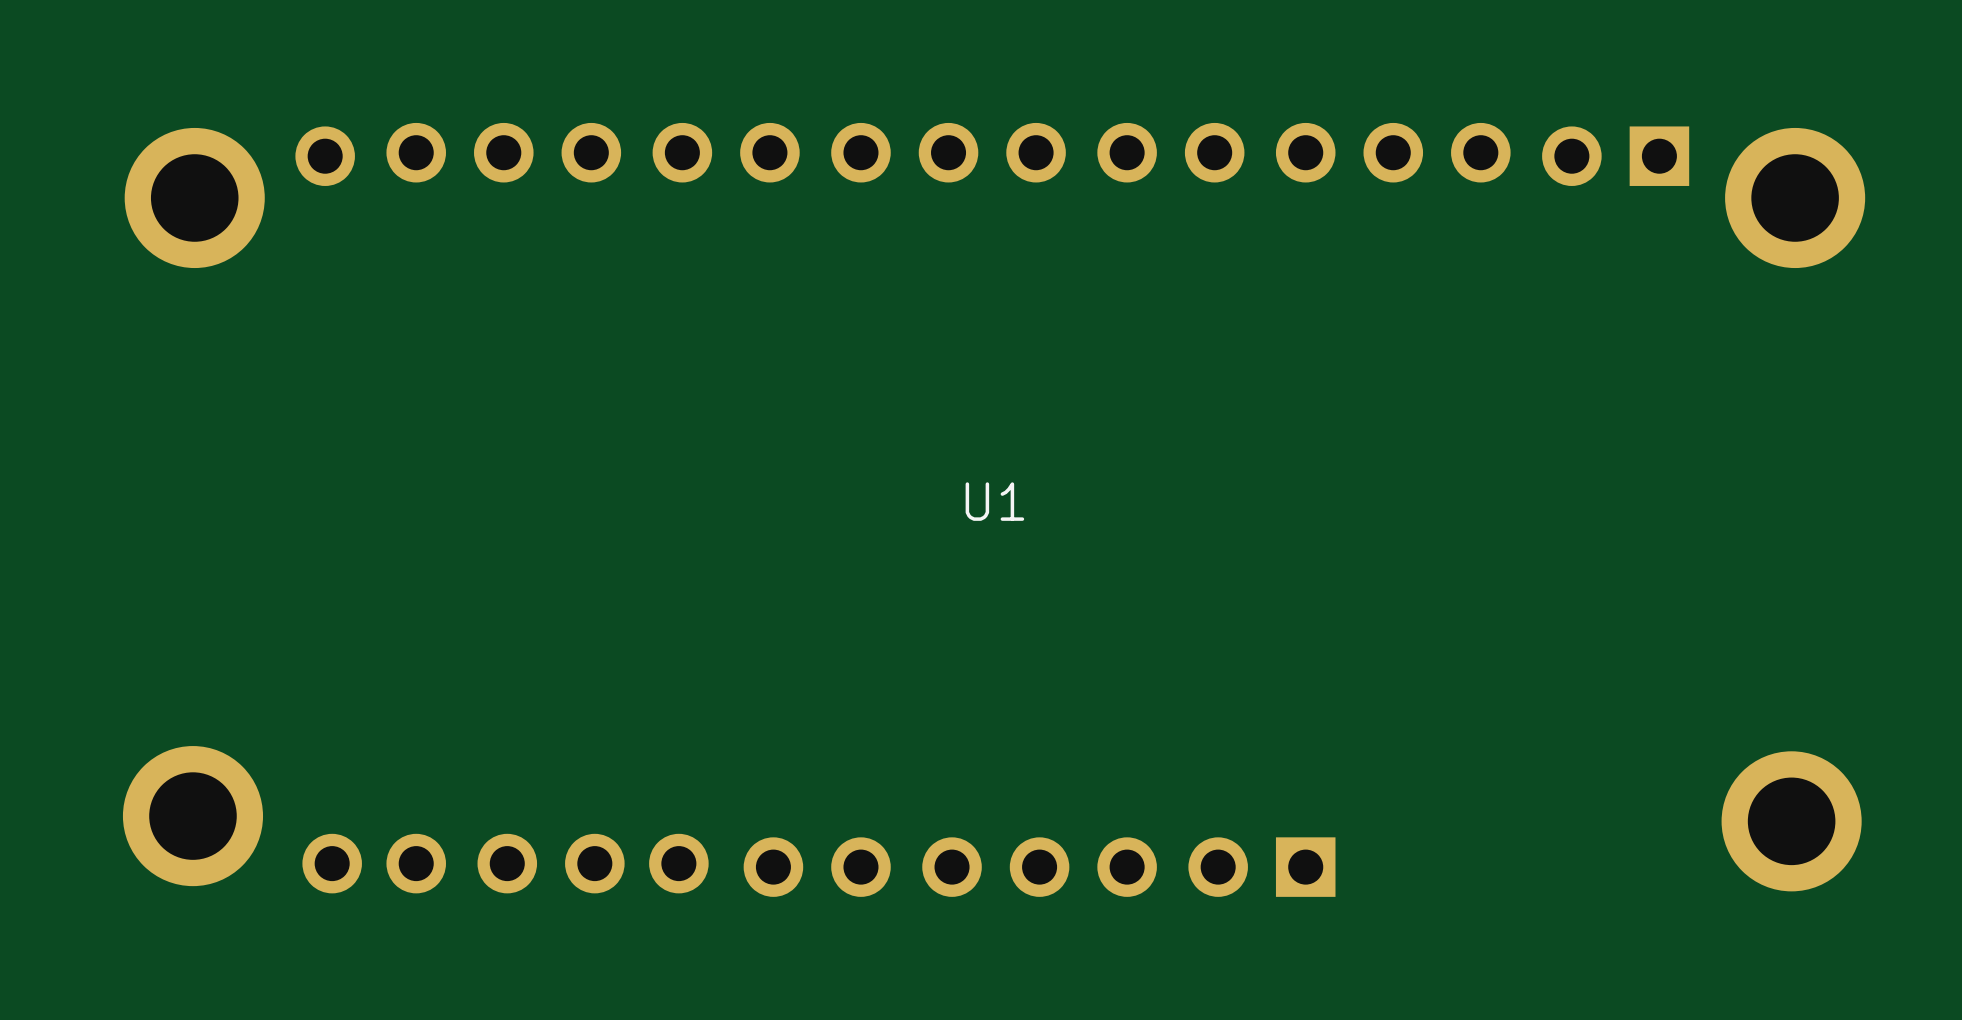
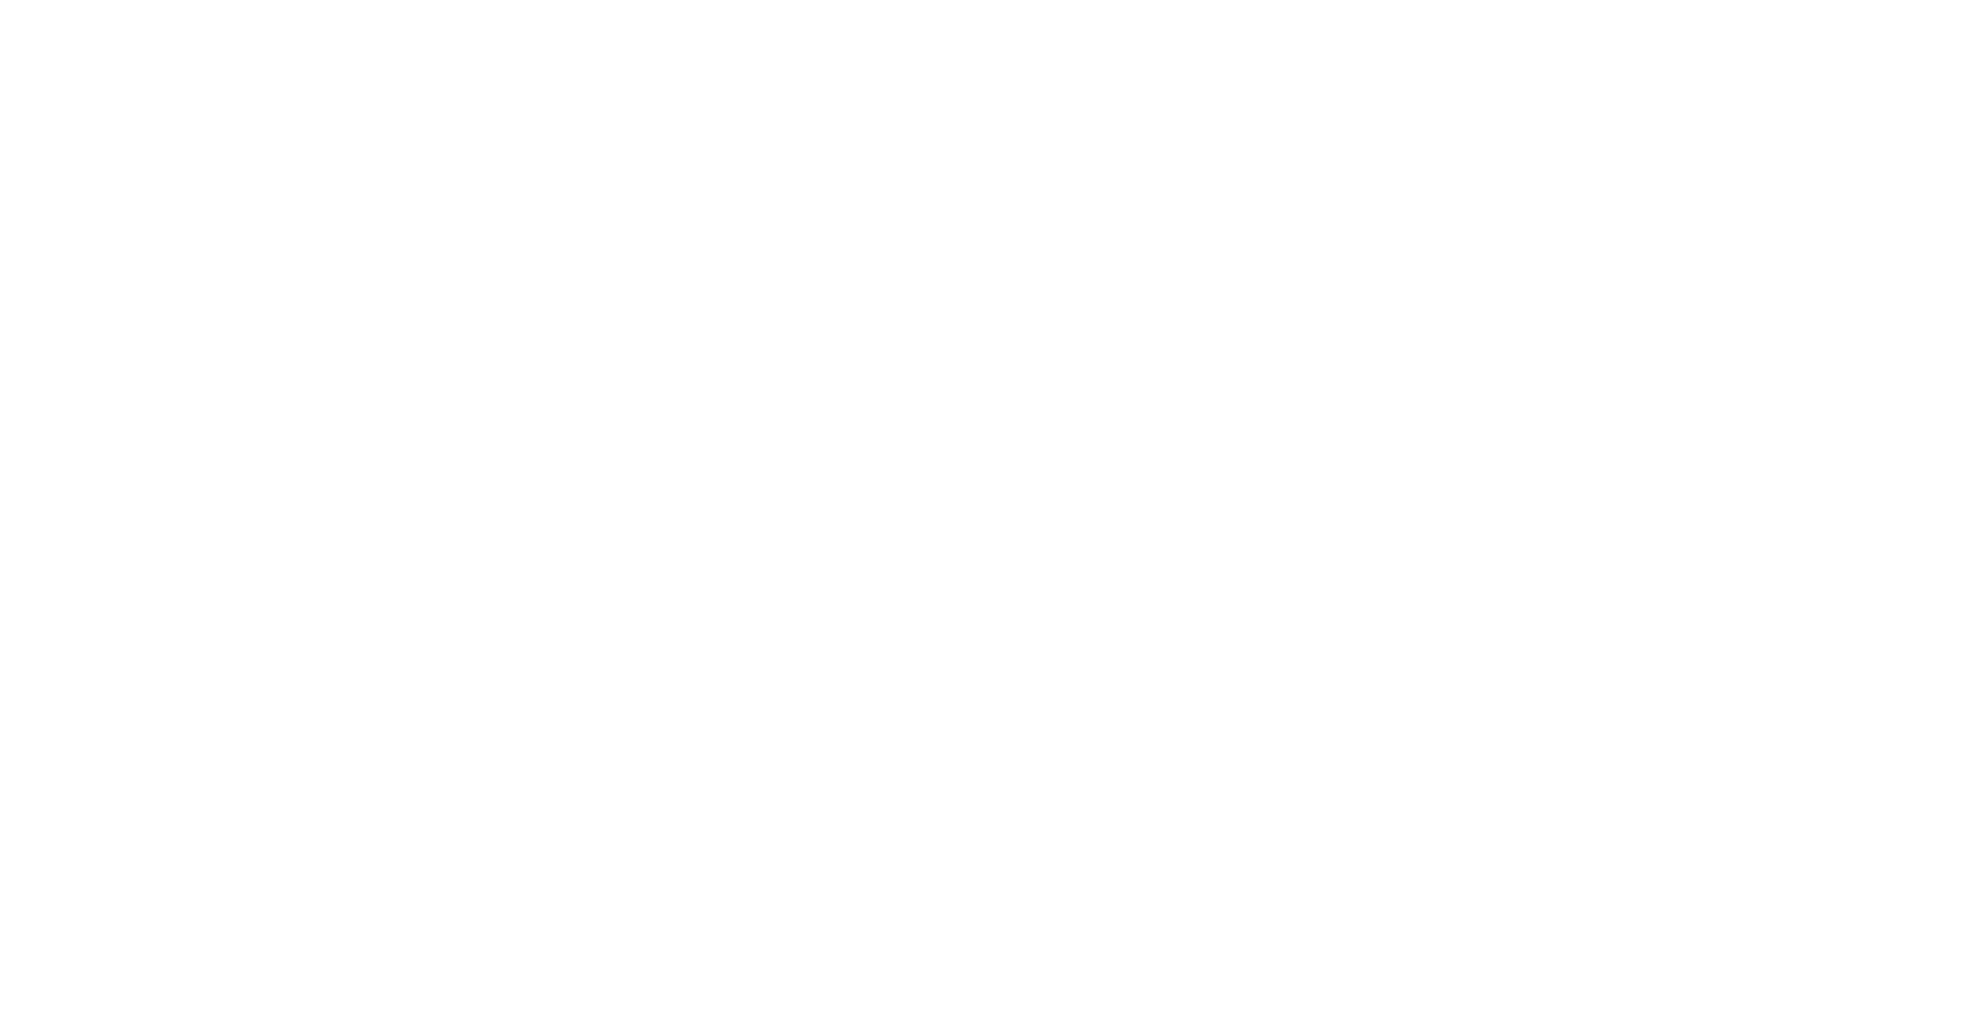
U1: (994, 509) -> none

